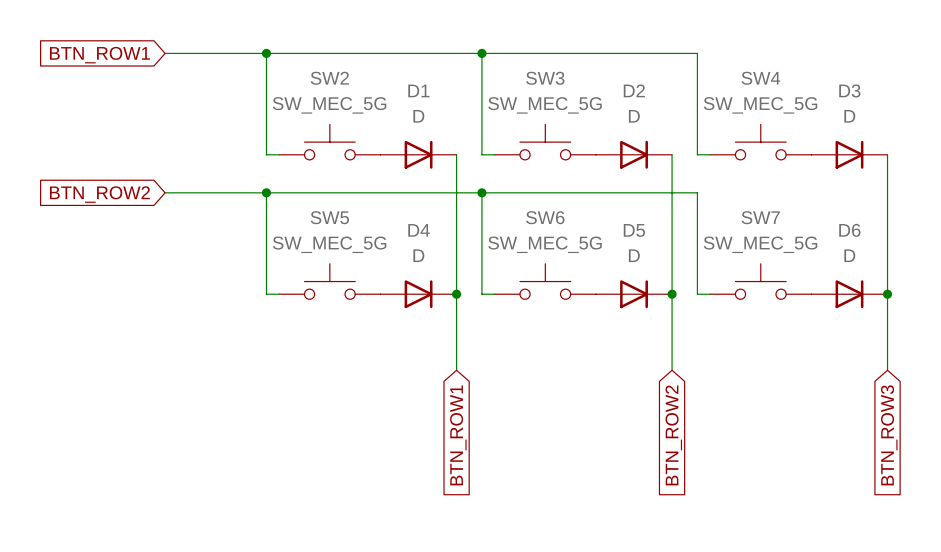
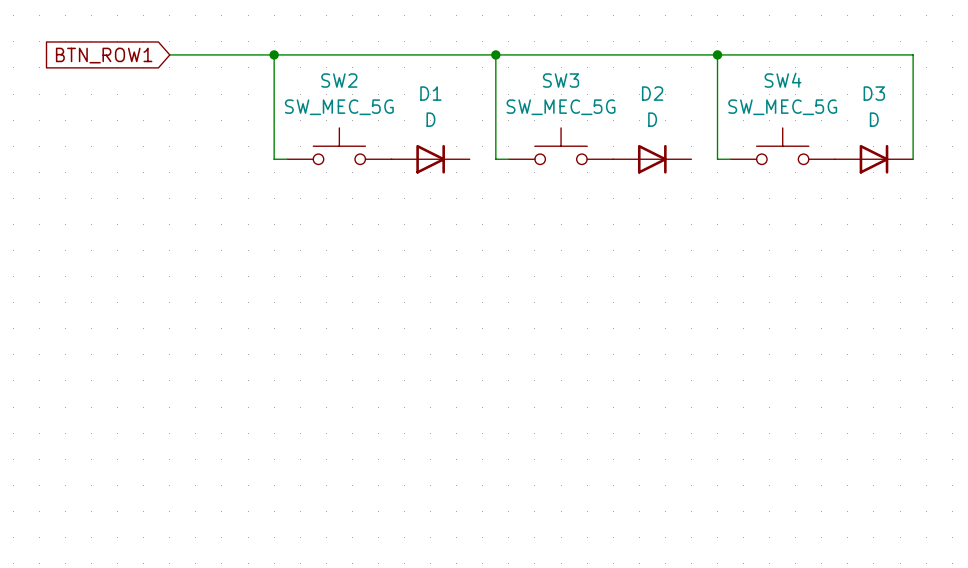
junction: none -> (717, 54)
wire: (456, 154) (456, 370) -> none
wire: (672, 154) (672, 370) -> none
wire: (887, 154) (887, 370) -> (913, 159) (913, 54) (717, 54)
wire: (165, 192) (697, 192) (697, 294) (710, 294) -> none
wire: (266, 192) (266, 294) (279, 294) -> none
junction: (266, 192) -> none
wire: (481, 192) (481, 294) (494, 294) -> none
junction: (481, 192) -> none
global label: BTN_ROW2 (99, 194) -> none
SW5: SW_MEC_5G (329, 281) -> none
SW6: SW_MEC_5G (545, 281) -> none
SW7: SW_MEC_5G (760, 281) -> none
D4: D (418, 294) -> none
junction: (456, 294) -> none
D5: D (634, 294) -> none
junction: (672, 294) -> none
D6: D (849, 294) -> none
junction: (887, 294) -> none
global label: BTN_ROW1 (458, 435) -> none
global label: BTN_ROW2 (673, 435) -> none
global label: BTN_ROW3 (889, 435) -> none

